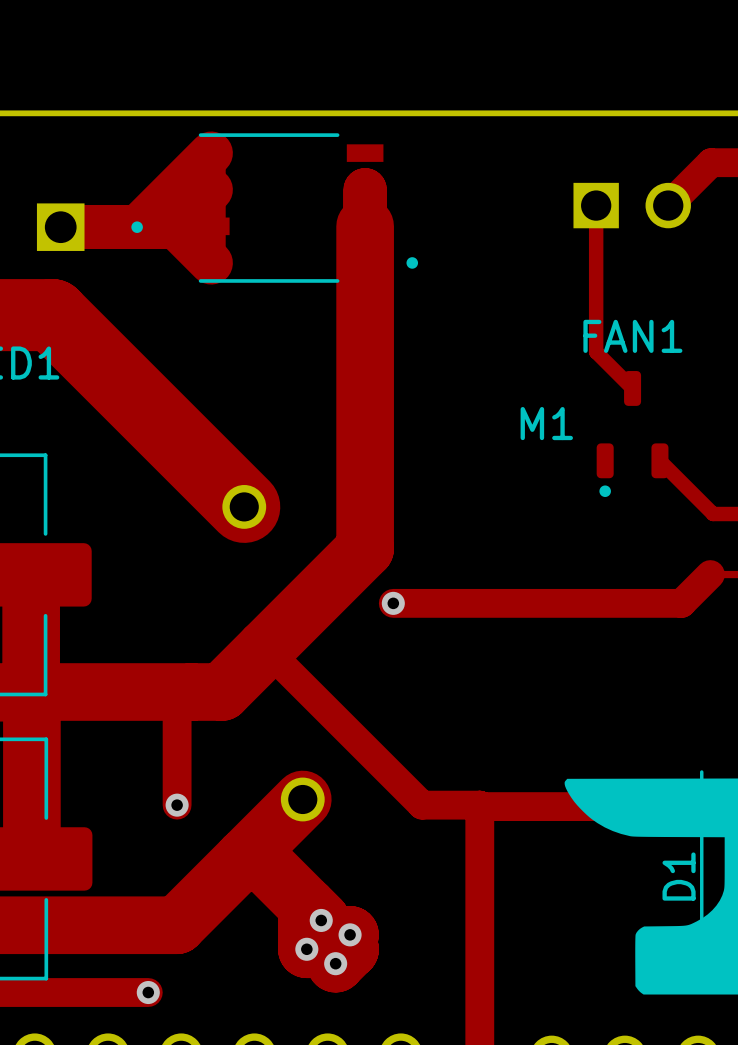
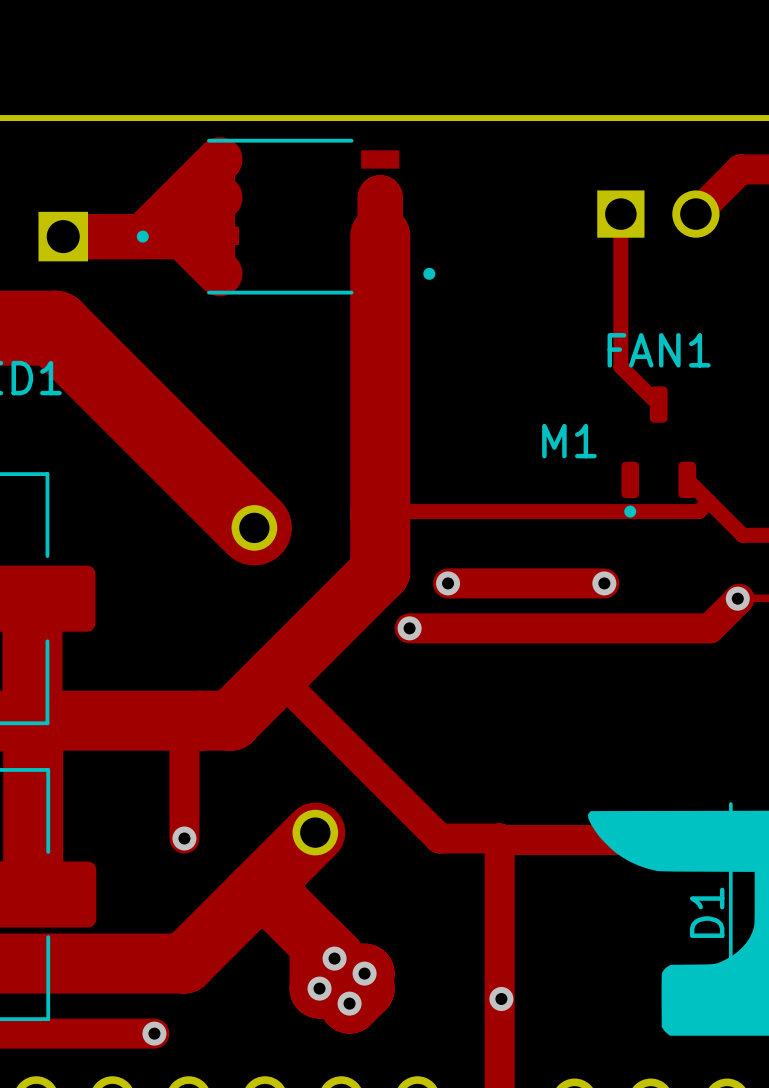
track: none -> (709, 501) (699, 511) (383, 511) (380, 514)
track: none -> (448, 583) (604, 583)
via: none -> (448, 583)
via: none -> (604, 583)
via: none -> (737, 598)
via: none -> (501, 998)

